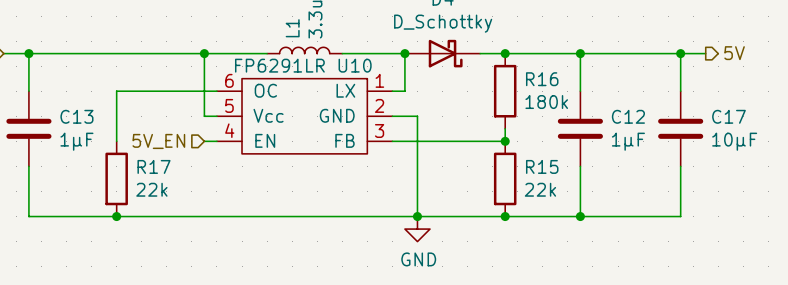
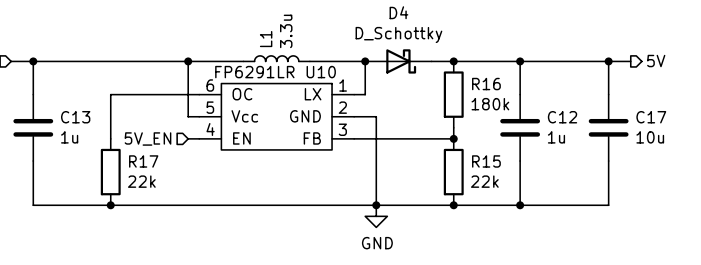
C13 value: 1µF (76, 141) -> 1u (69, 137)
C12 value: 1µF (628, 141) -> 1u (556, 137)
C17 value: 10µF (734, 141) -> 10u (650, 137)

